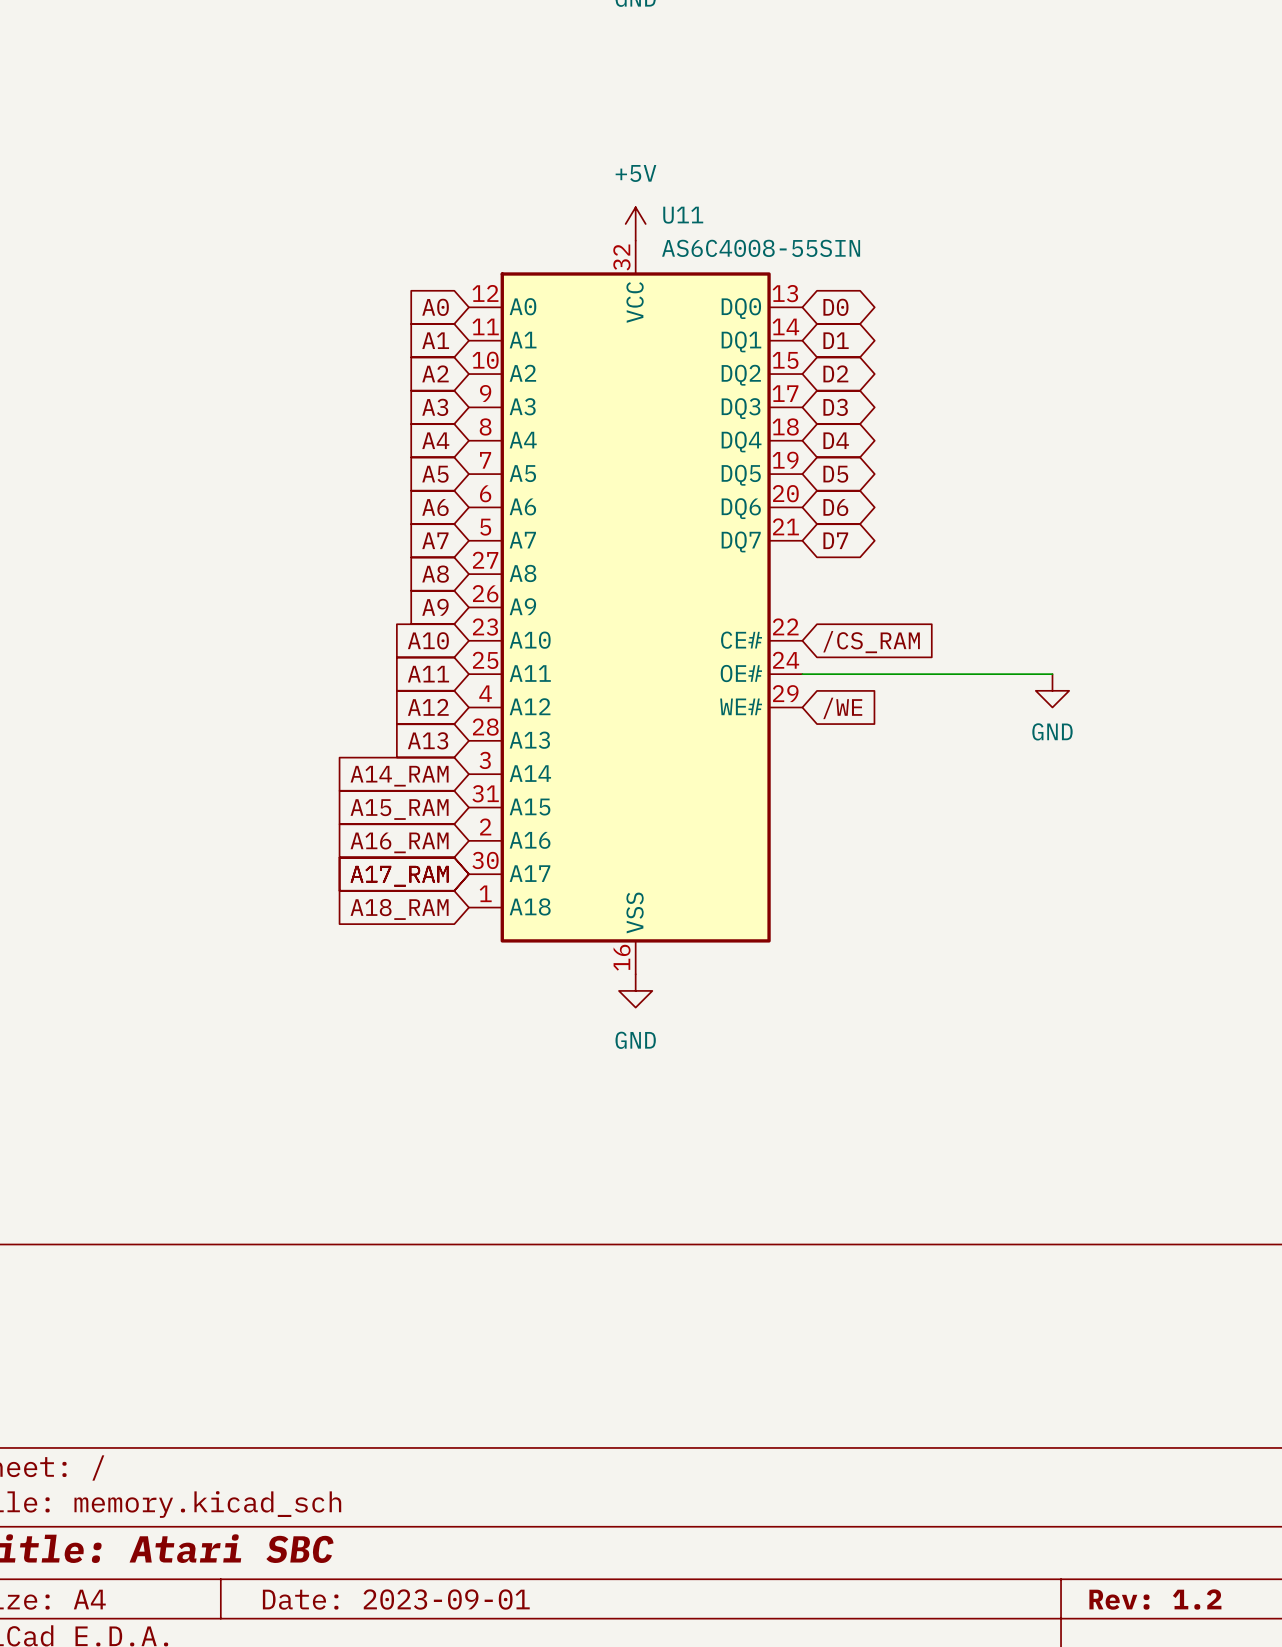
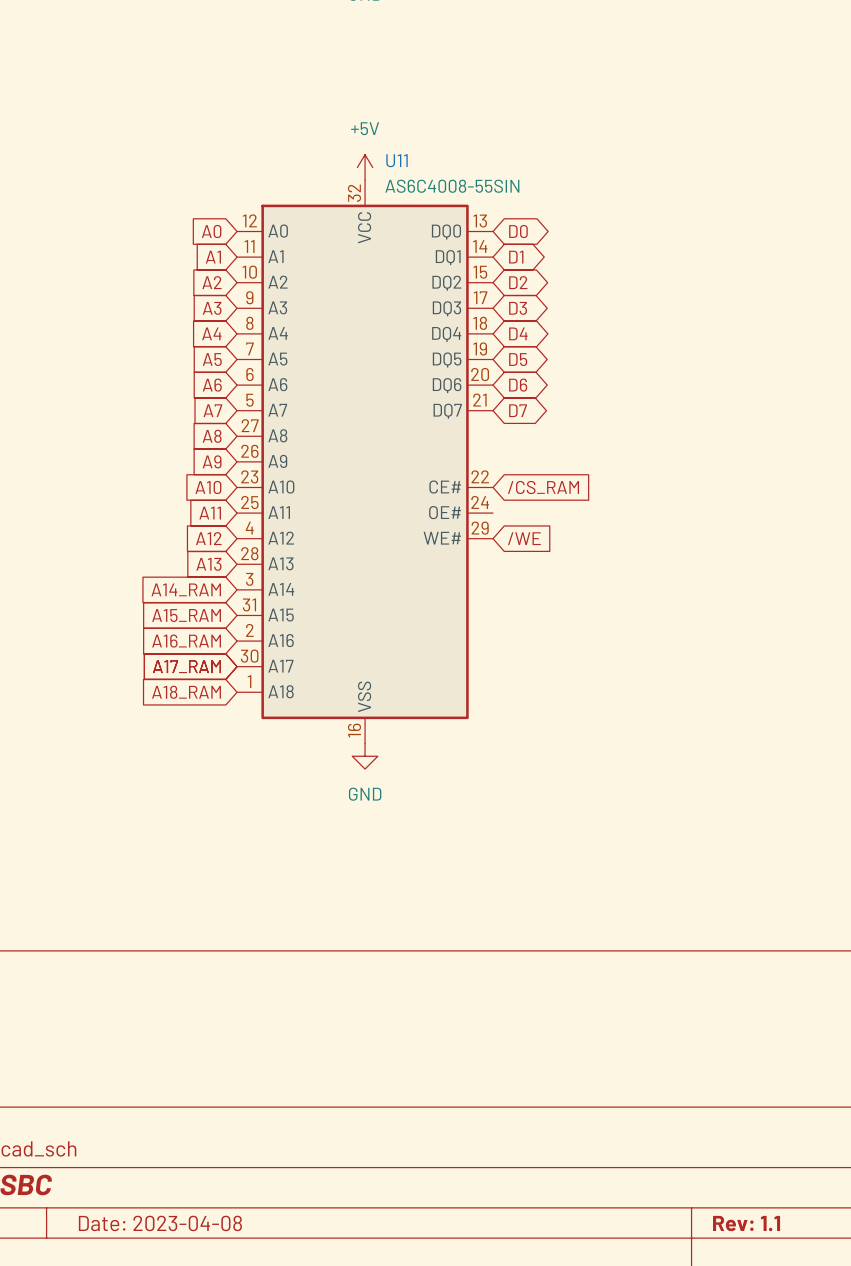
wire: (802, 674) (1052, 674) -> none
power symbol: GND (1052, 690) -> none
title block: Date: 2023-09-01 (396, 1599) -> Date: 2023-04-08 (160, 1223)
title block: Rev: 1.2 (1155, 1599) -> Rev: 1.1 (746, 1223)

